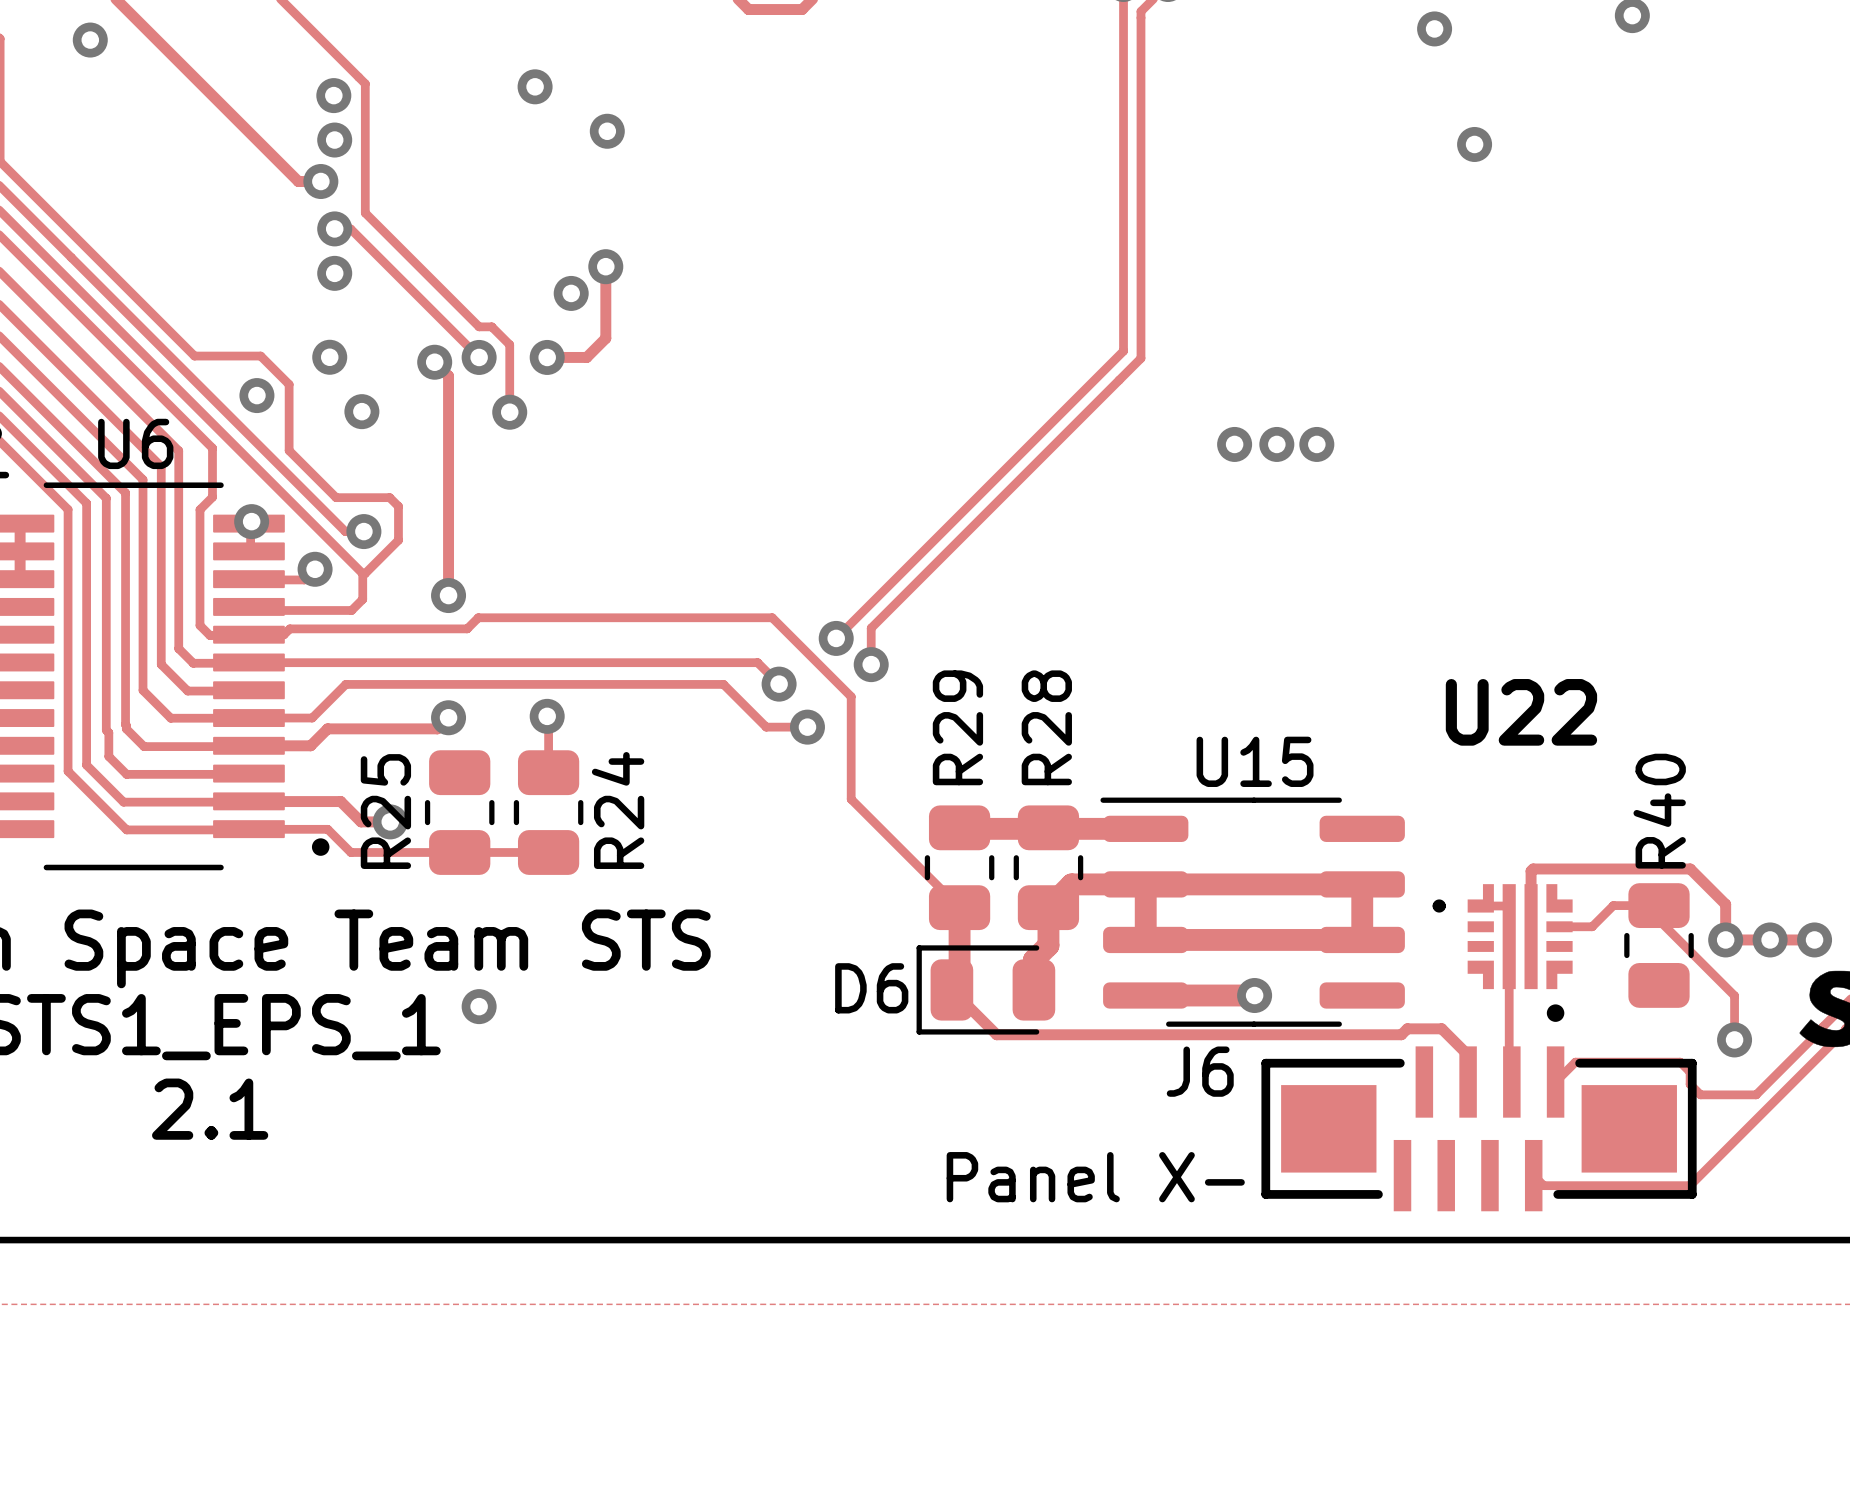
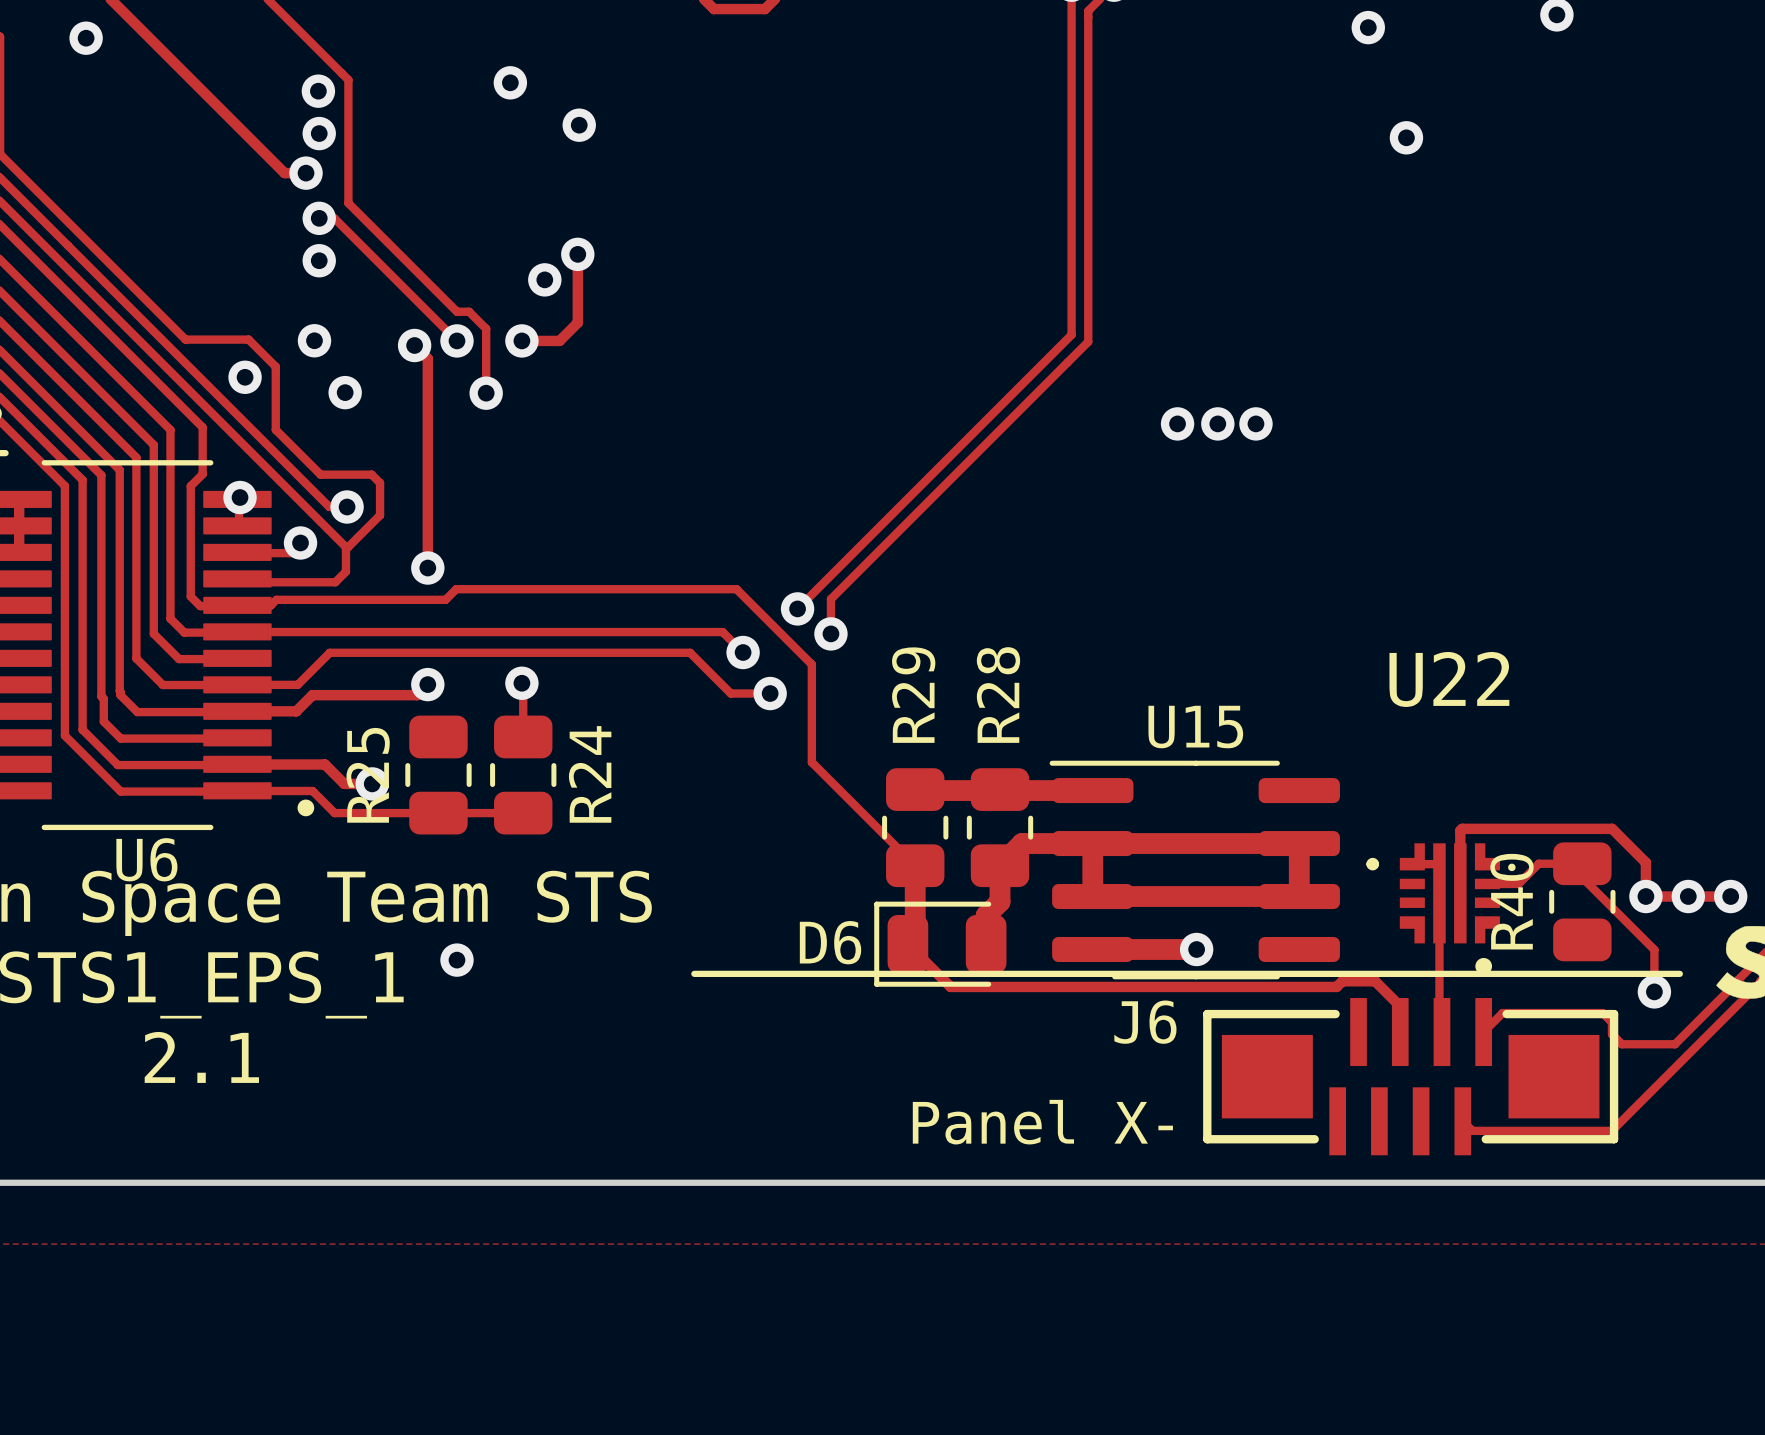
U6 name position: U6 (135, 443) -> U6 (146, 859)
R40 name position: R40 (1659, 811) -> R40 (1511, 901)
line: none -> (694, 973) (1679, 973)

